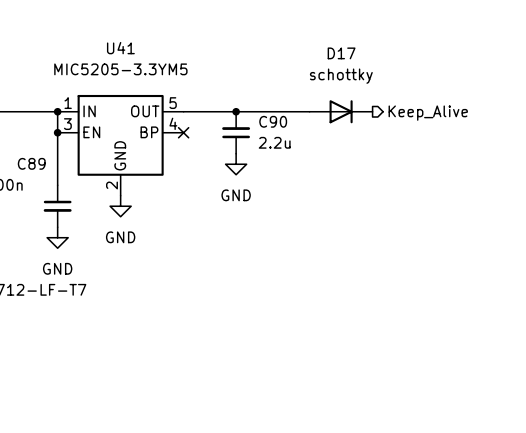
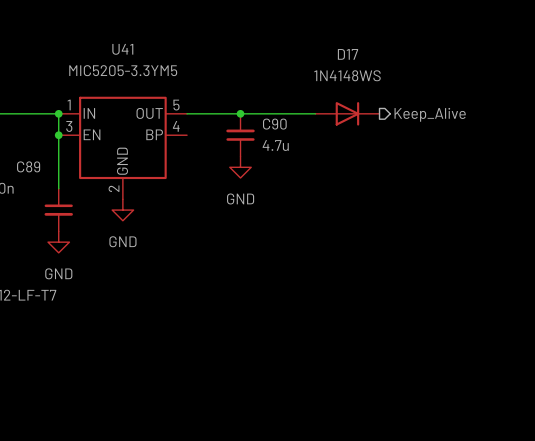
D17 value: schottky (341, 76) -> 1N4148WS (347, 75)
no-connect mark: (183, 132) -> none
C90 value: 2.2u (274, 142) -> 4.7u (275, 145)

